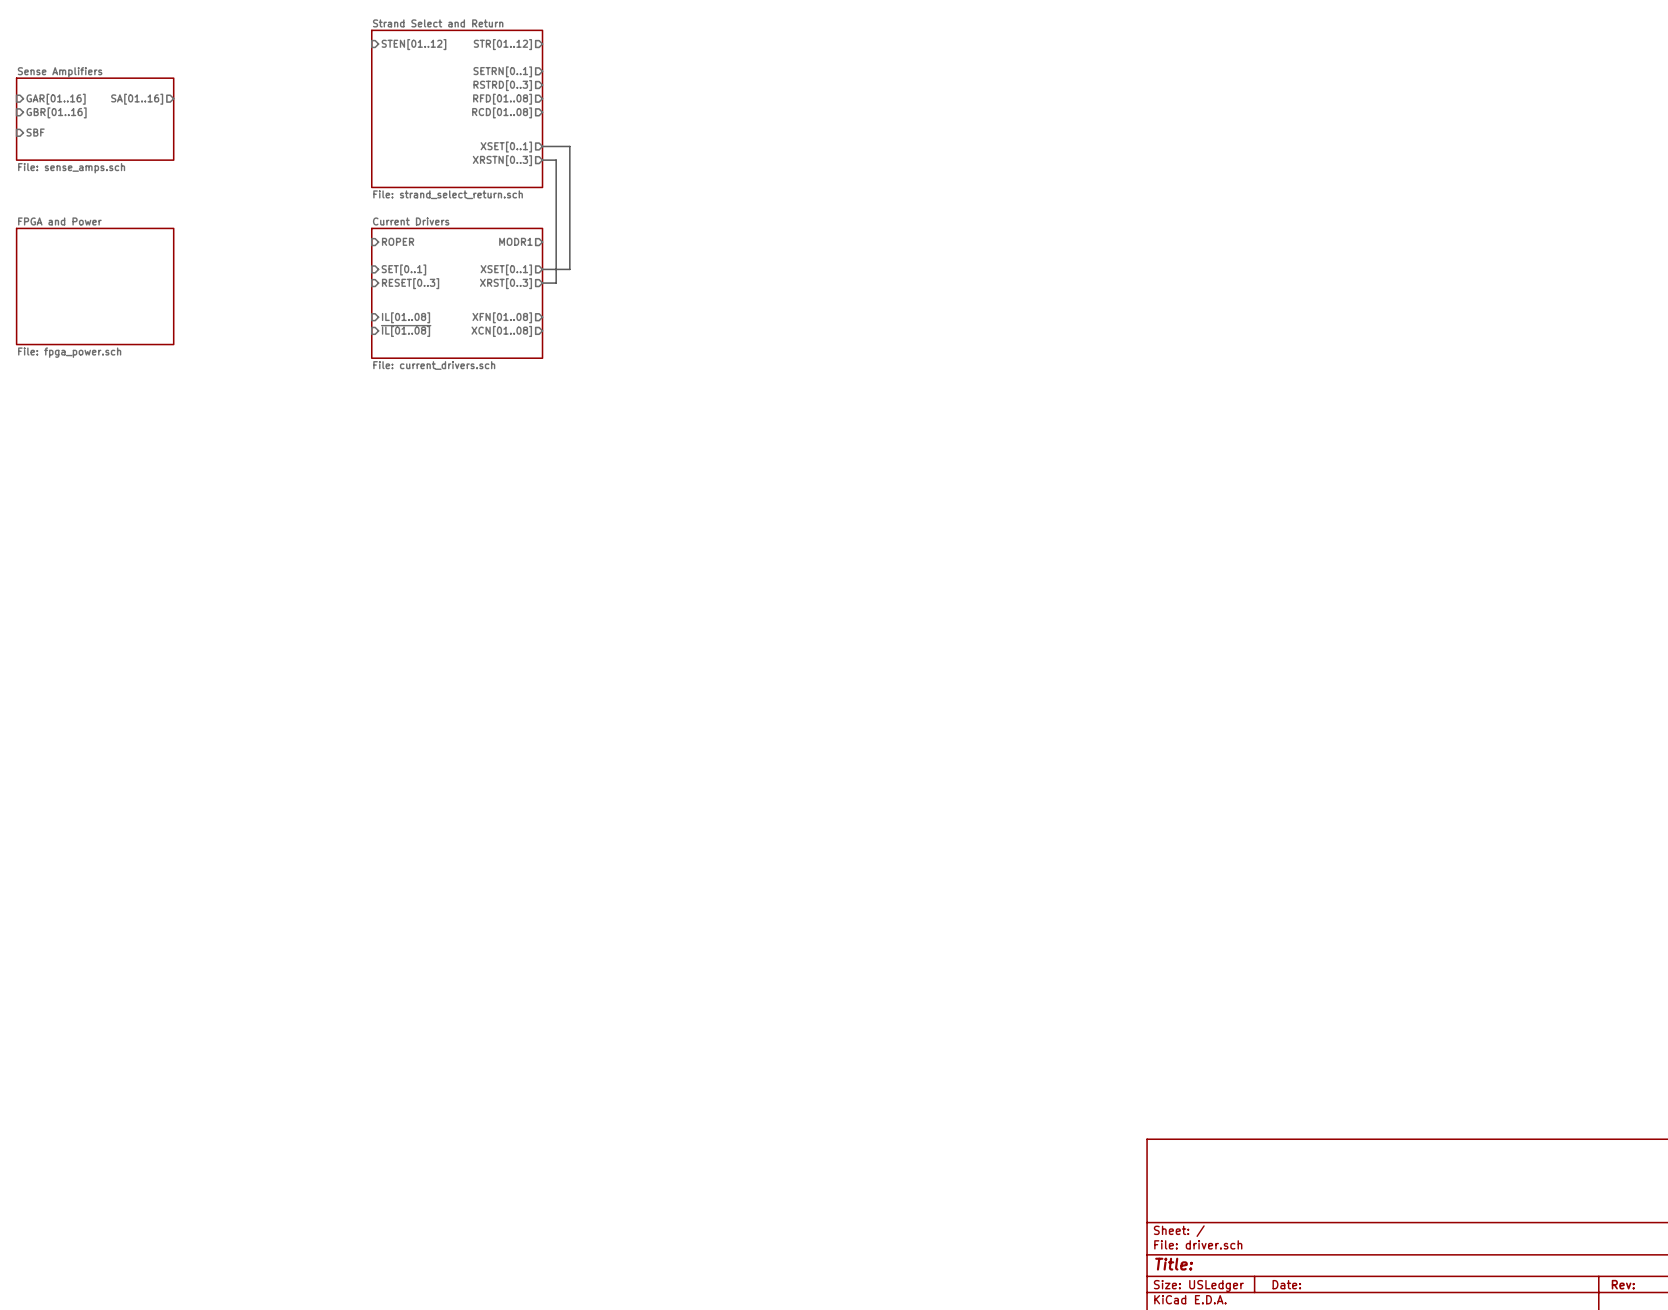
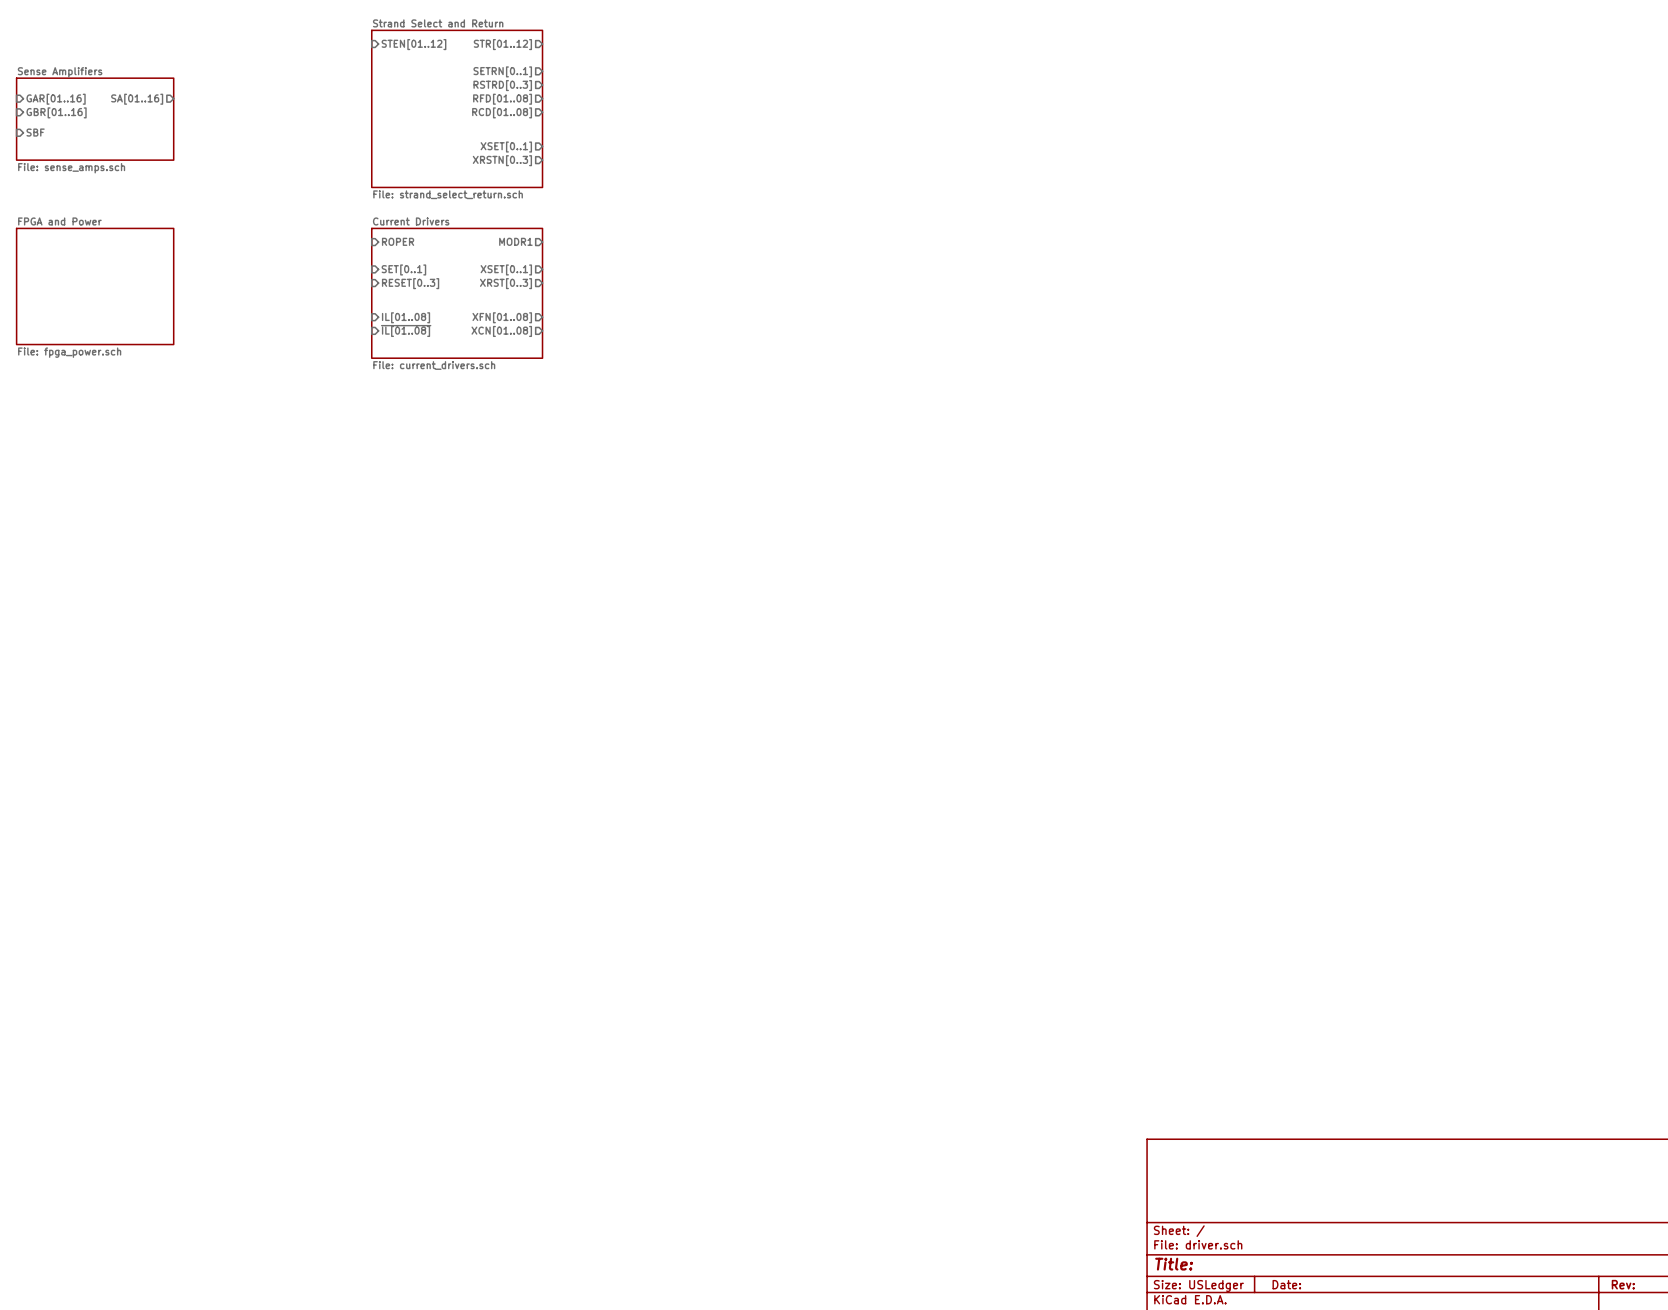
bus: (542, 146) (569, 146) (569, 269) (542, 269) -> none
bus: (542, 160) (556, 160) (556, 283) (542, 283) -> none

